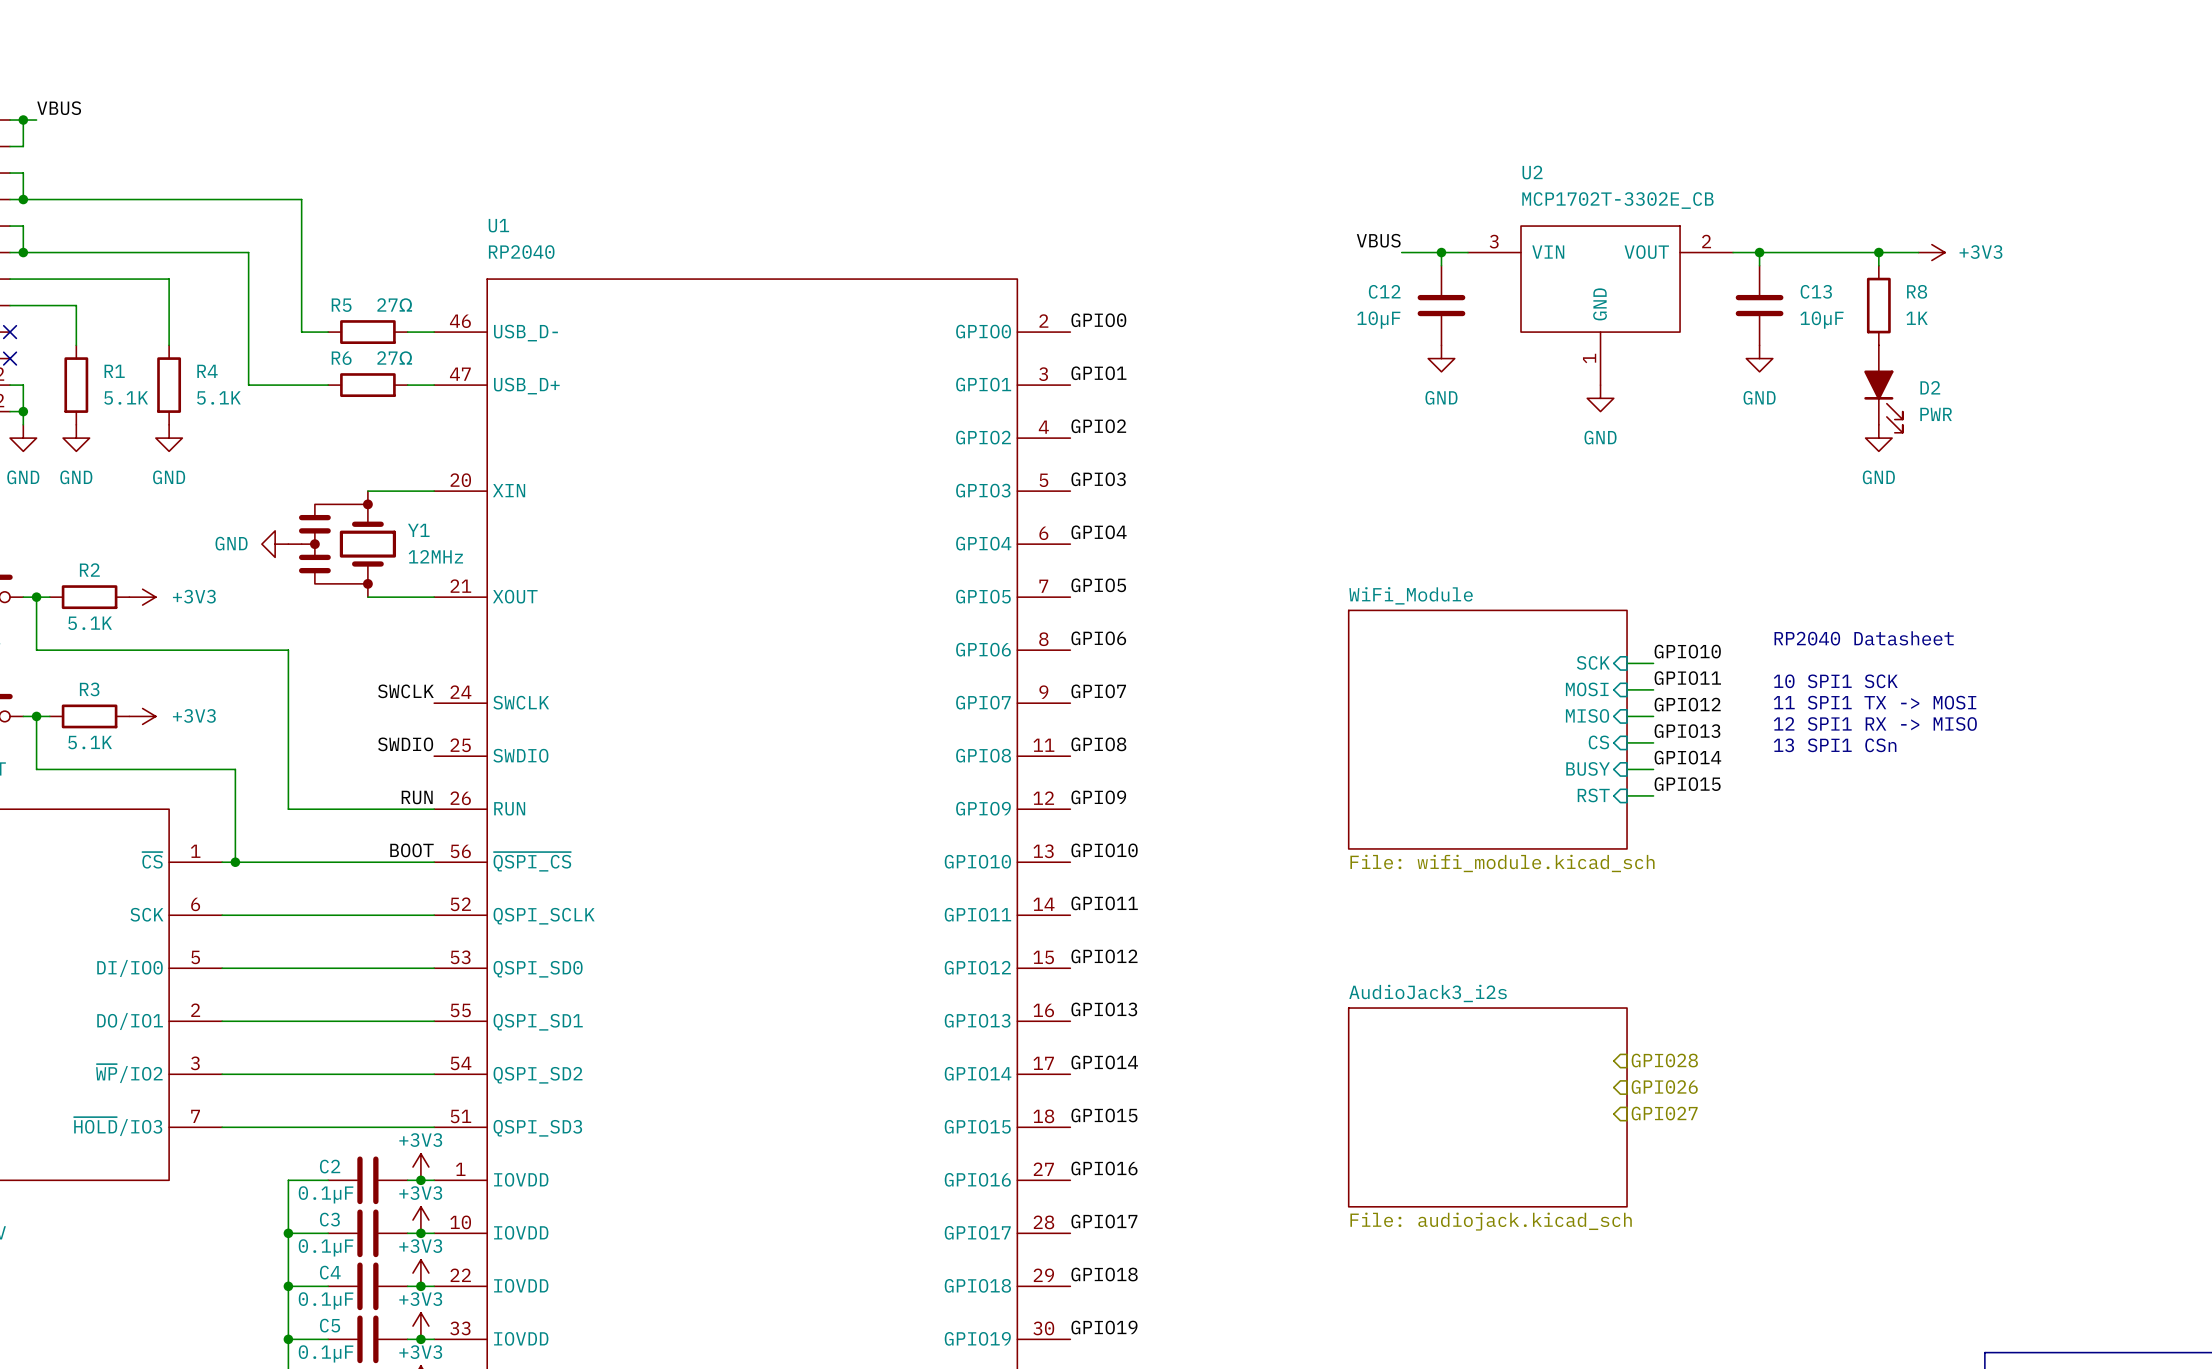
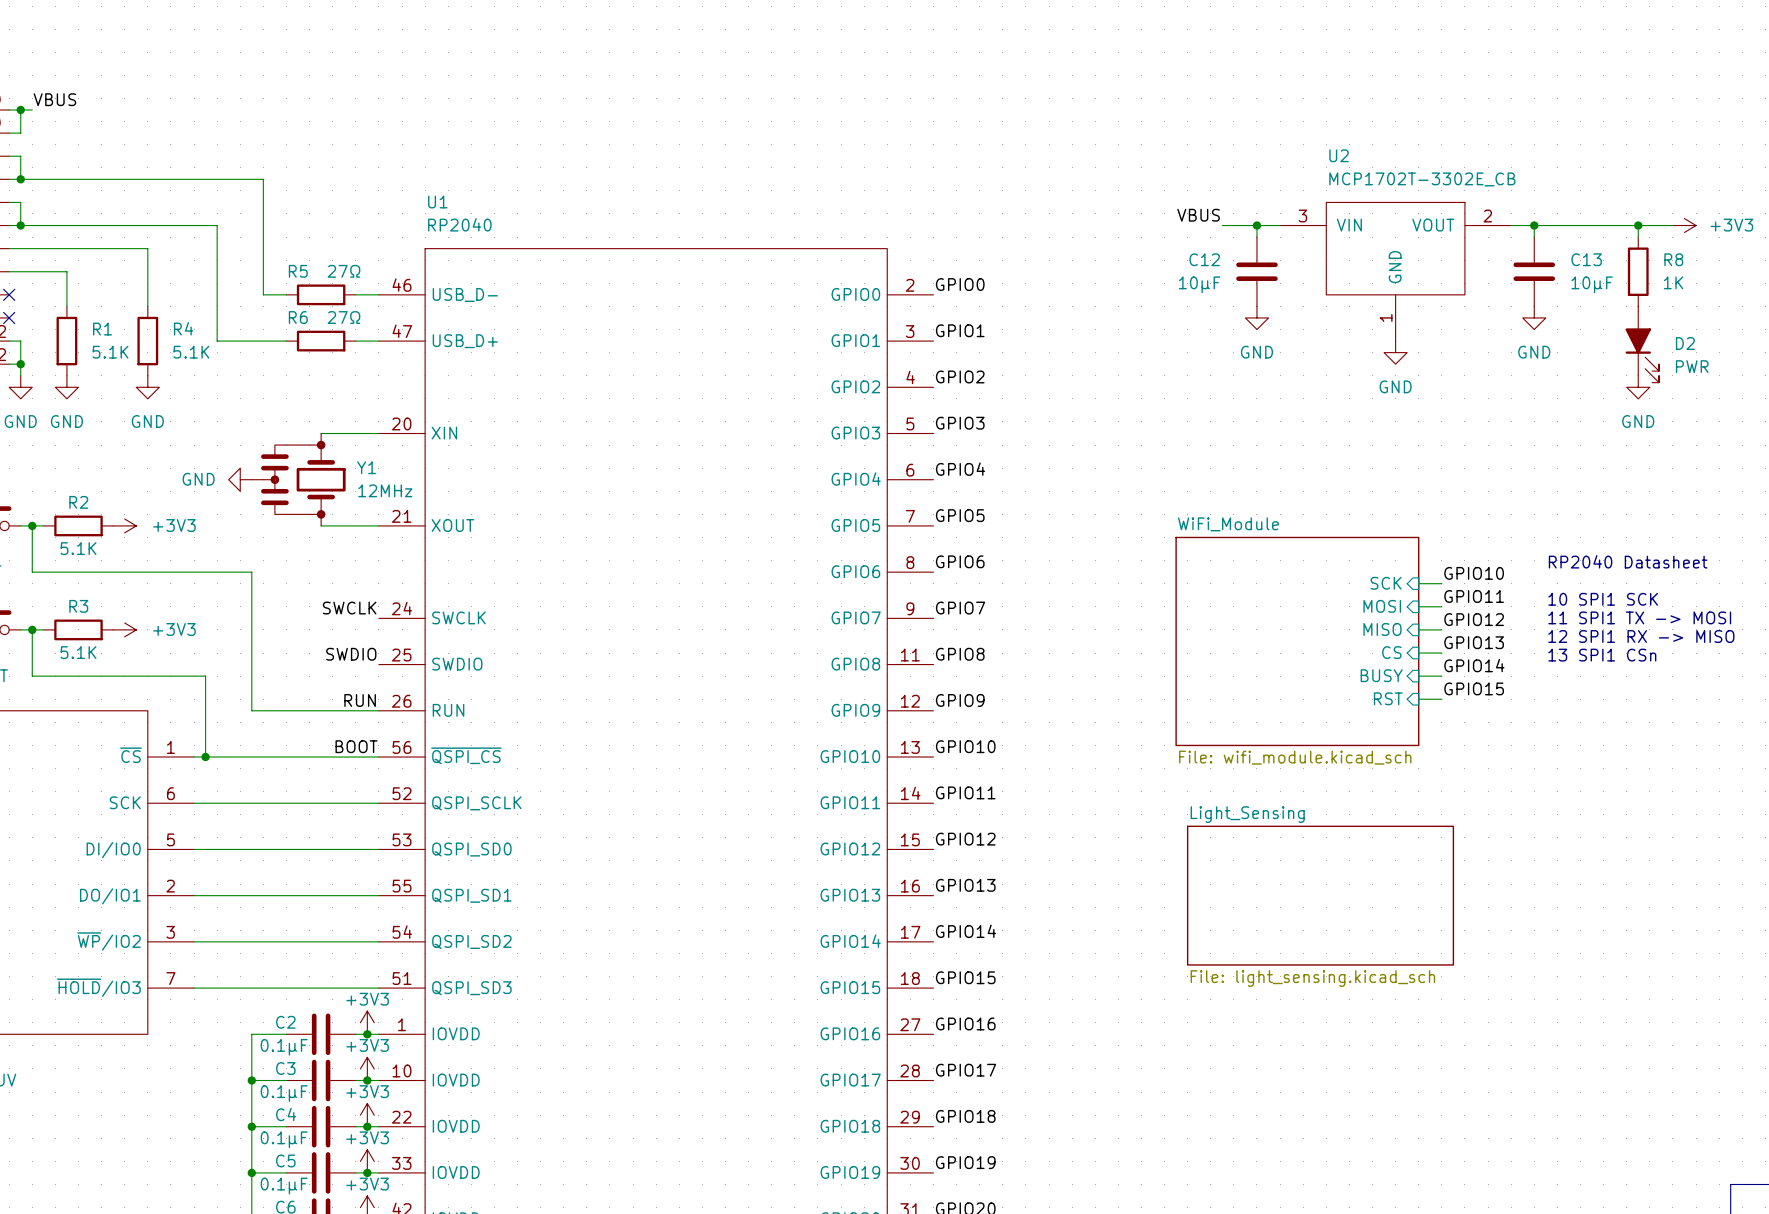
sheet Light_Sensing: none -> File: light_sensing.kicad_sch (1320, 895)
hierarchical label: GPI028 (1664, 1060) -> none
hierarchical label: GPI026 (1664, 1087) -> none
sheet AudioJack3_i2s: File: audiojack.kicad_sch (1487, 1107) -> none
hierarchical label: GPI027 (1664, 1113) -> none

